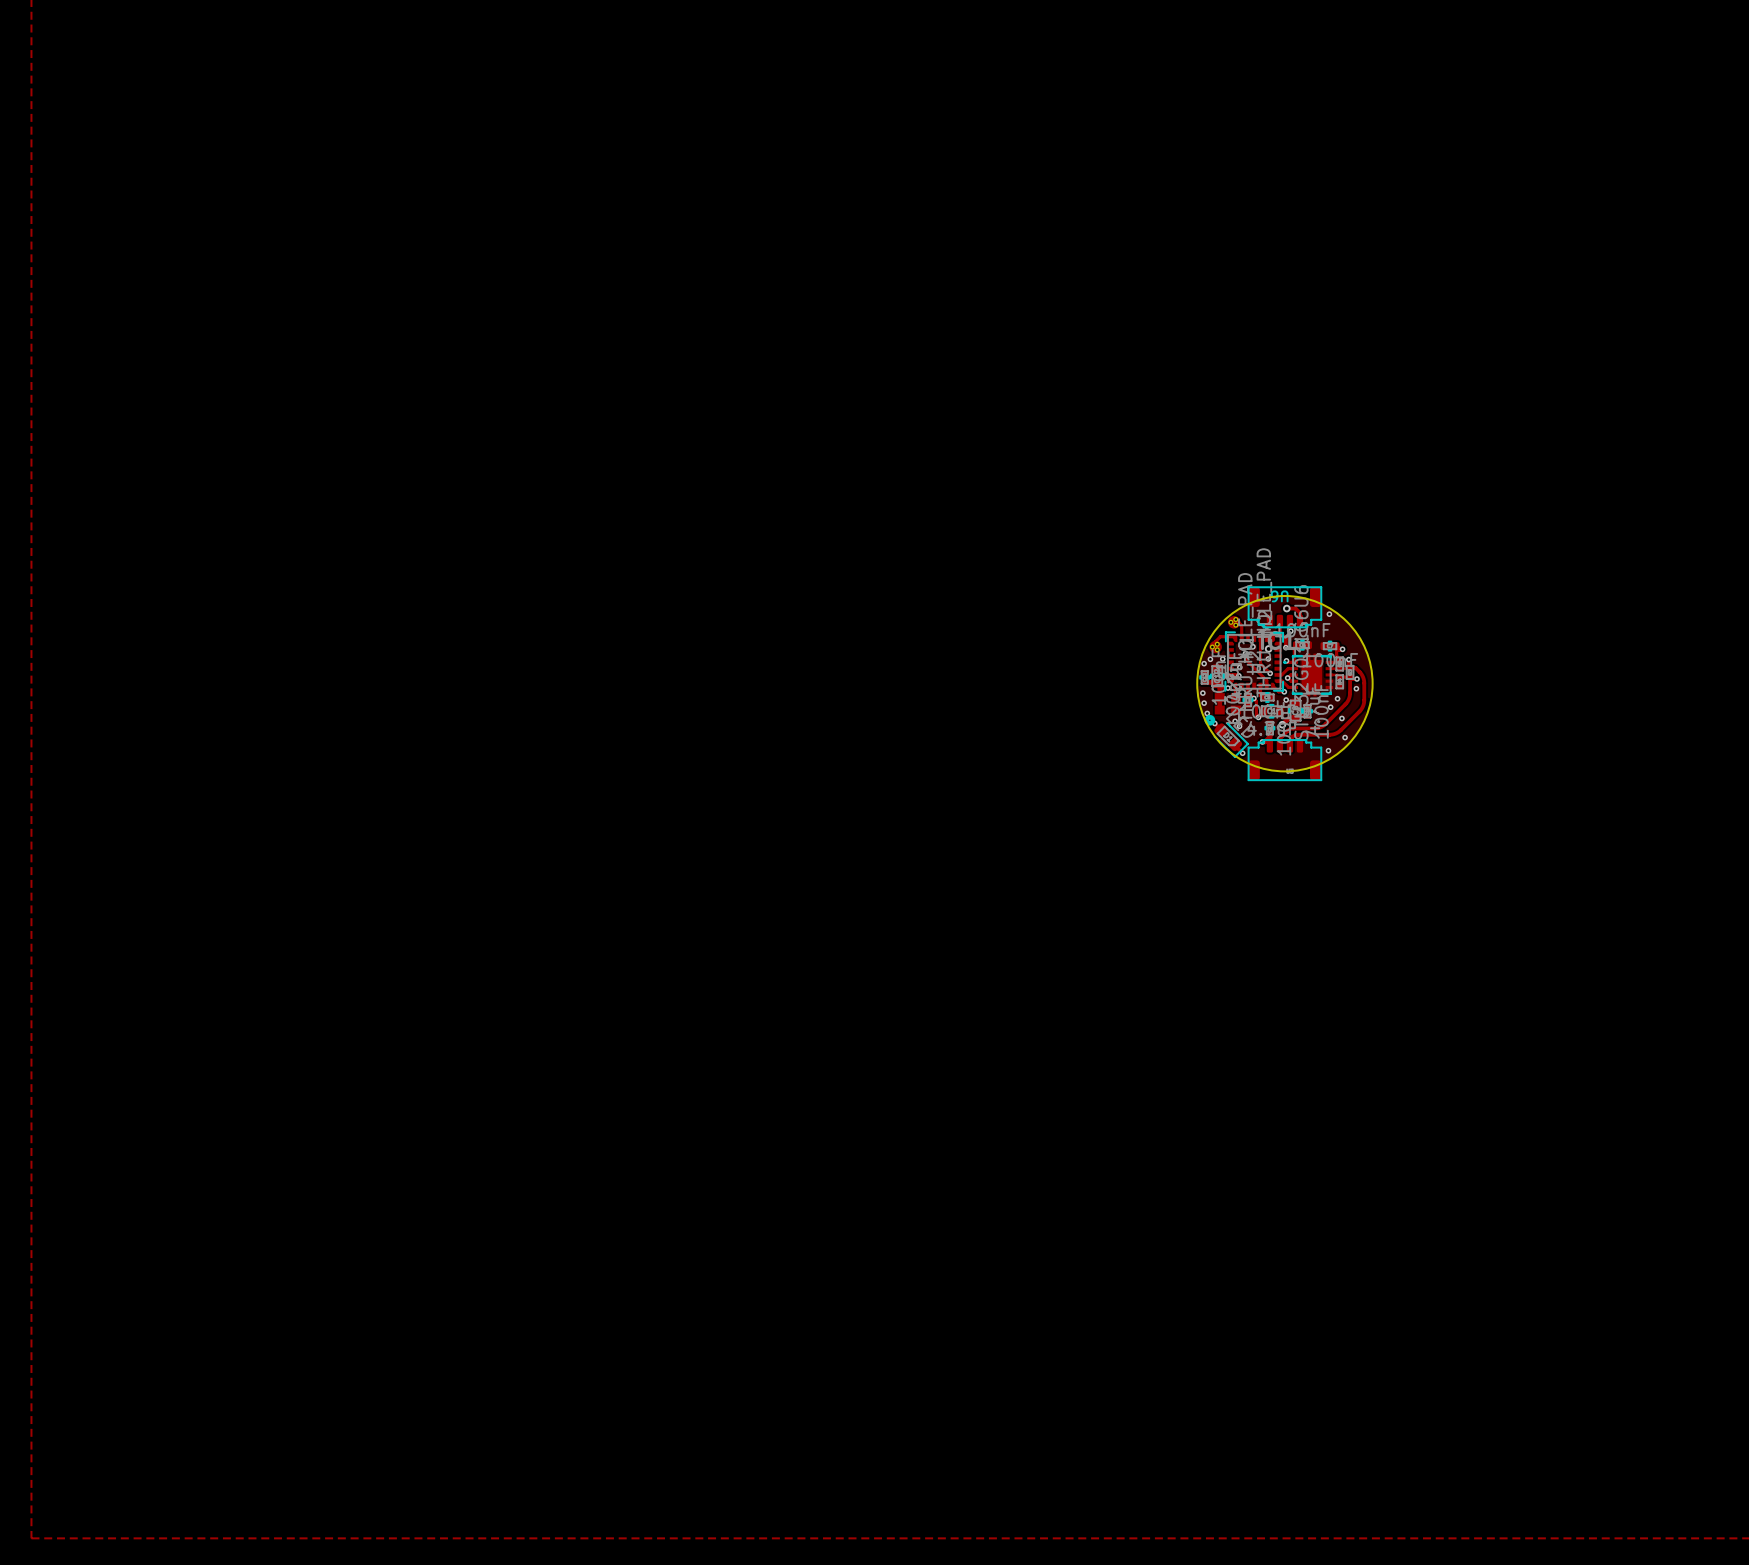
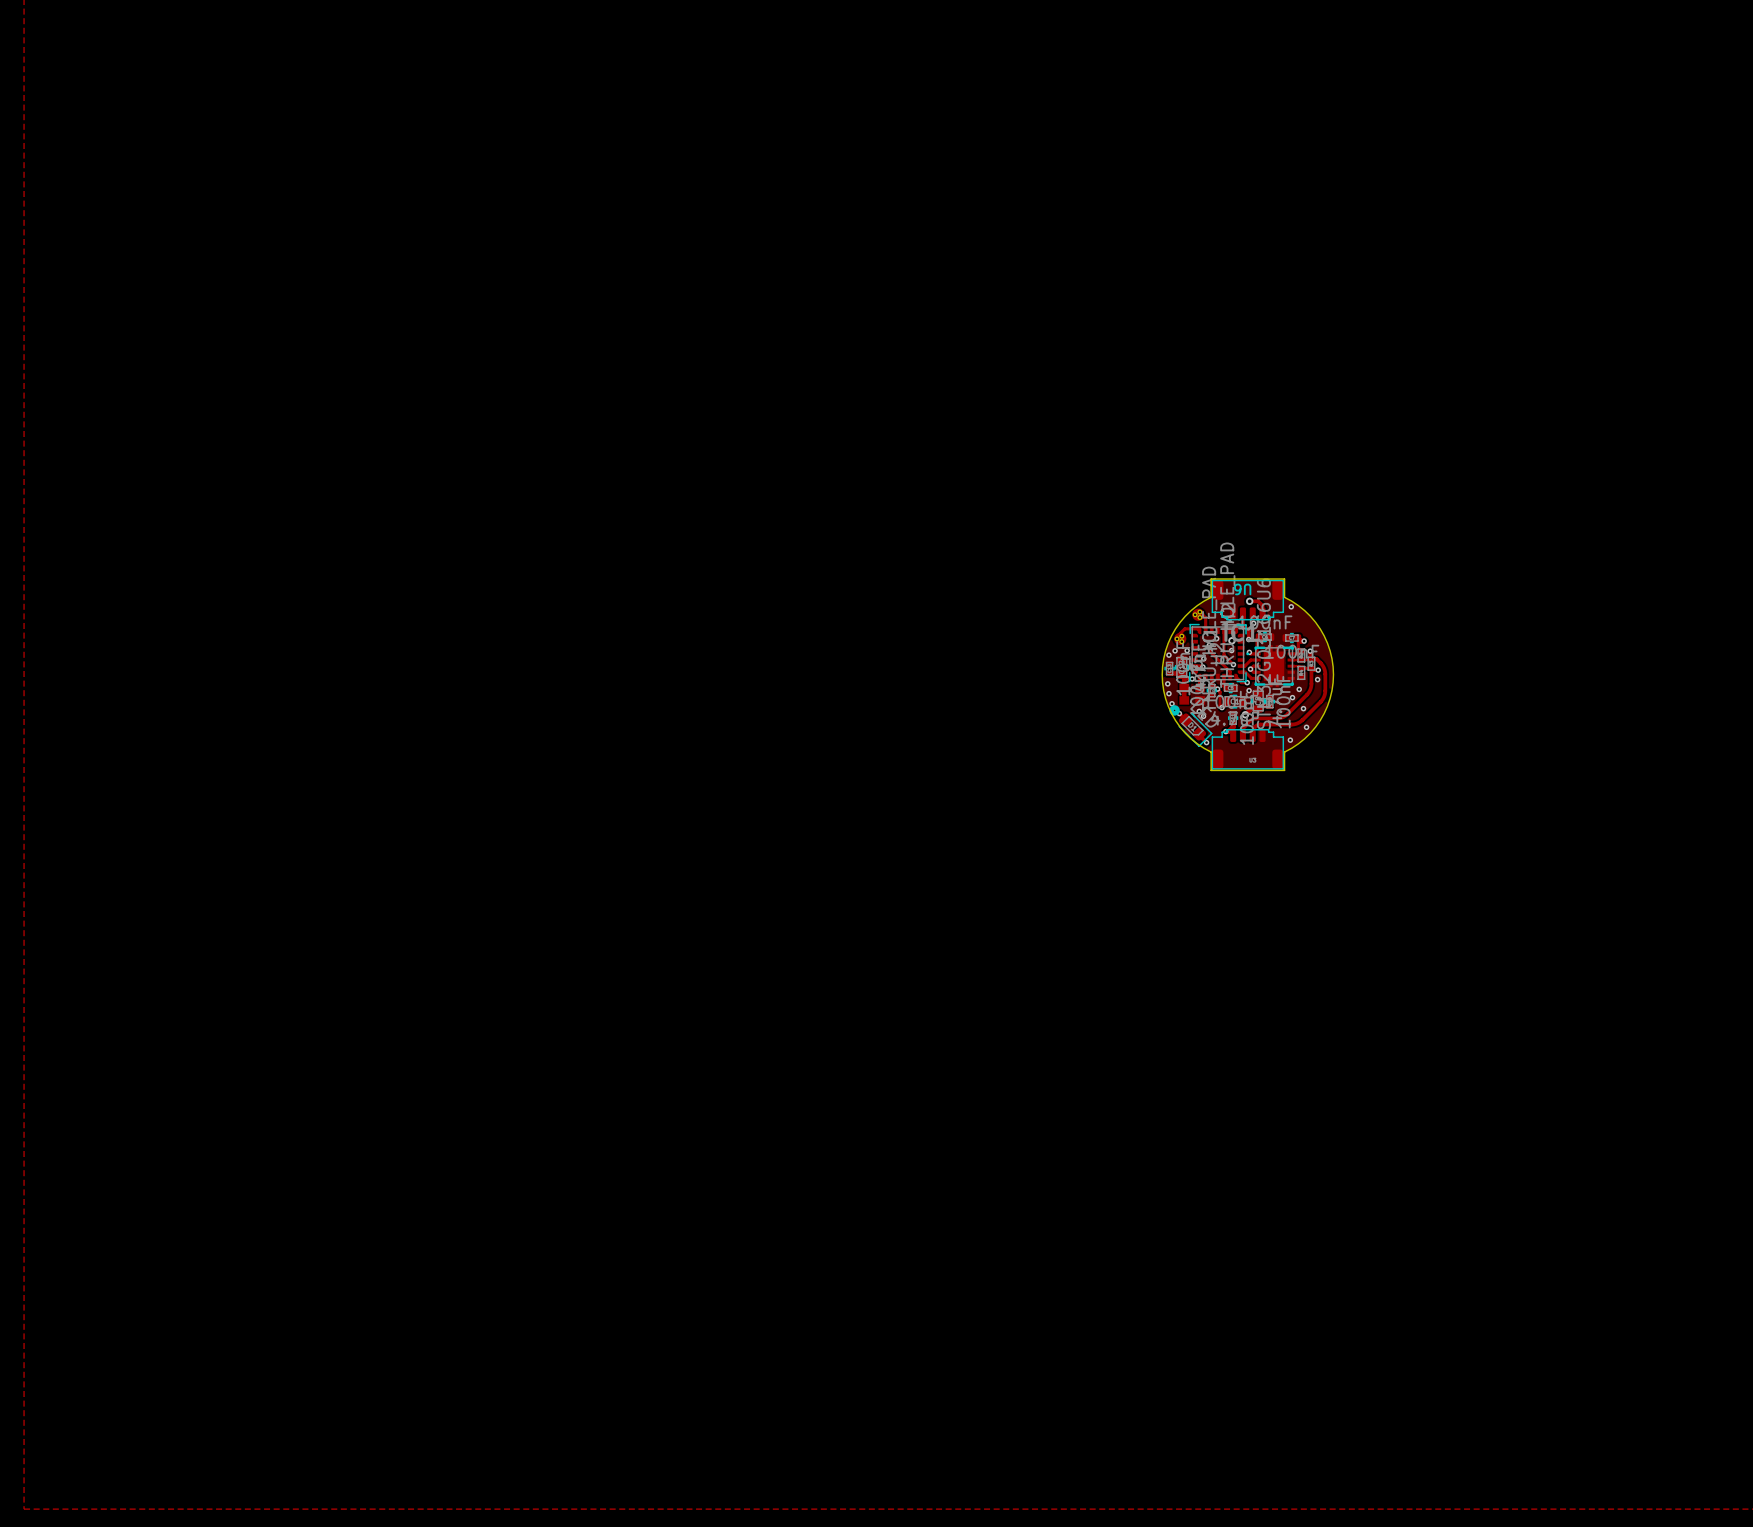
board edge: none -> (1211, 579) (1284, 579) (1284, 597) (1298, 605) (1310, 616) (1320, 628) (1327, 643) (1333, 666) (1333, 682) (1330, 698) (1324, 713) (1315, 727) (1304, 738) (1284, 752) (1284, 770) (1211, 770) (1211, 752) (1197, 743) (1185, 733) (1175, 720) (1168, 706) (1163, 690) (1162, 674) (1165, 650) (1171, 635) (1185, 616) (1197, 605) (1211, 597) (1211, 579)
round board edge: [1196, 595, 1374, 773] -> none

